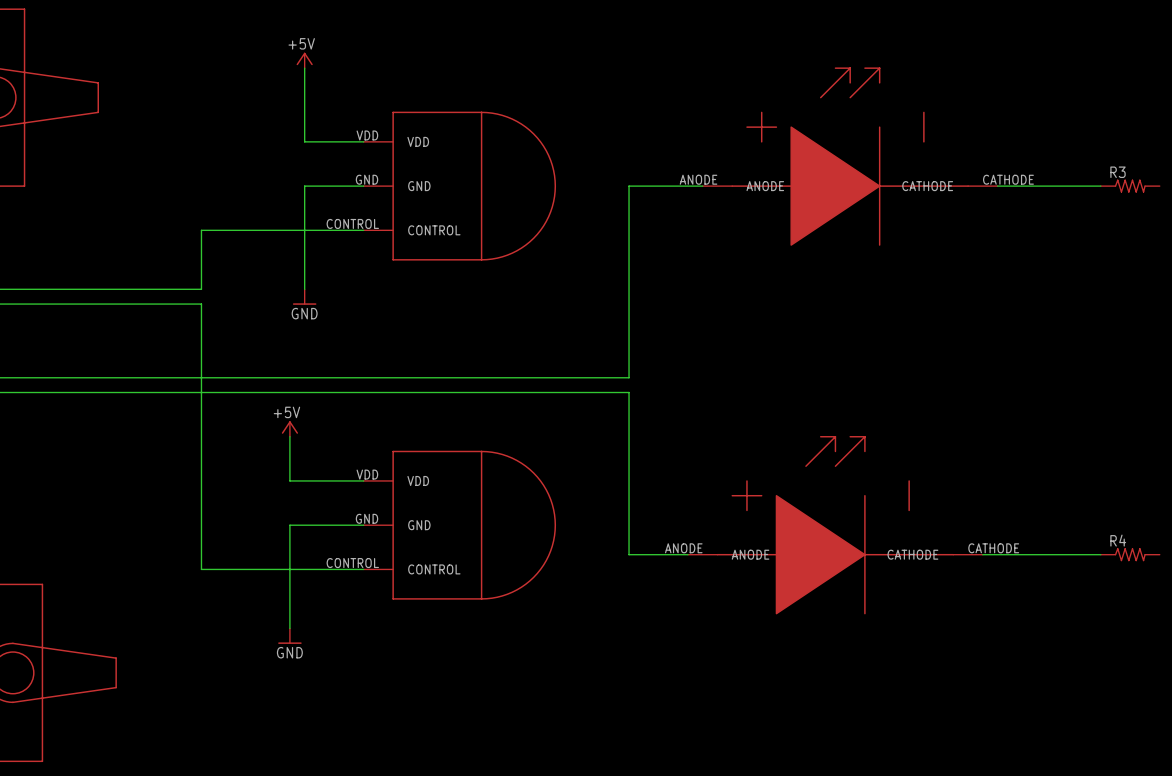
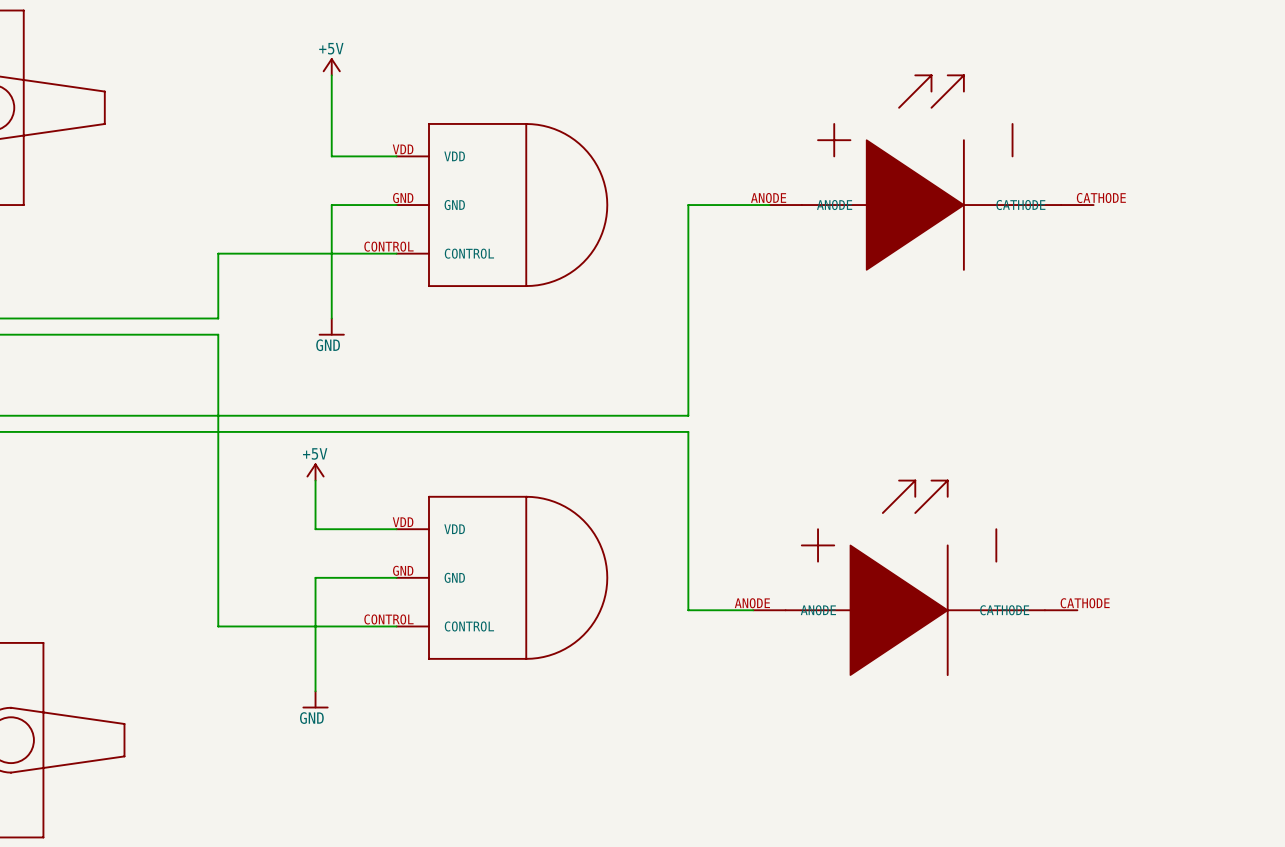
wire: (997, 186) (1100, 186) -> none
R3: (1130, 186) -> none
wire: (982, 554) (1100, 554) -> none
R4: (1130, 554) -> none

